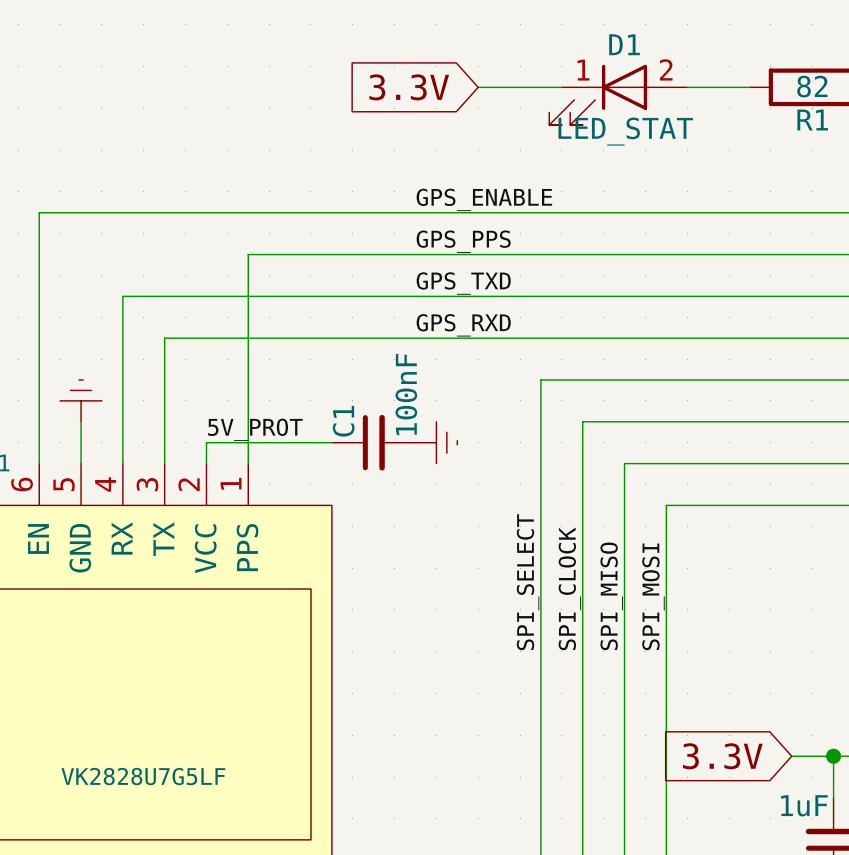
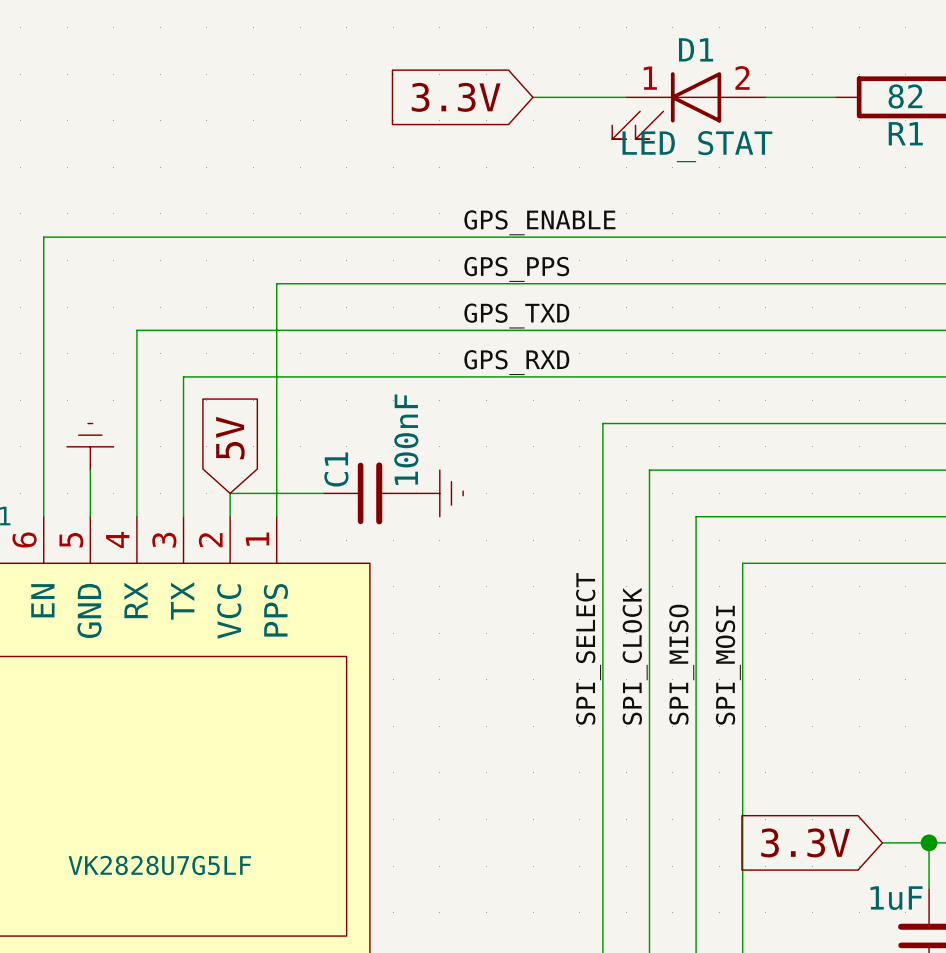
global label: none -> 5V (230, 438)
label: 5V_PROT (255, 429) -> none
C1 position: (373, 442) -> (369, 493)
power symbol position: (436, 442) -> (439, 493)

